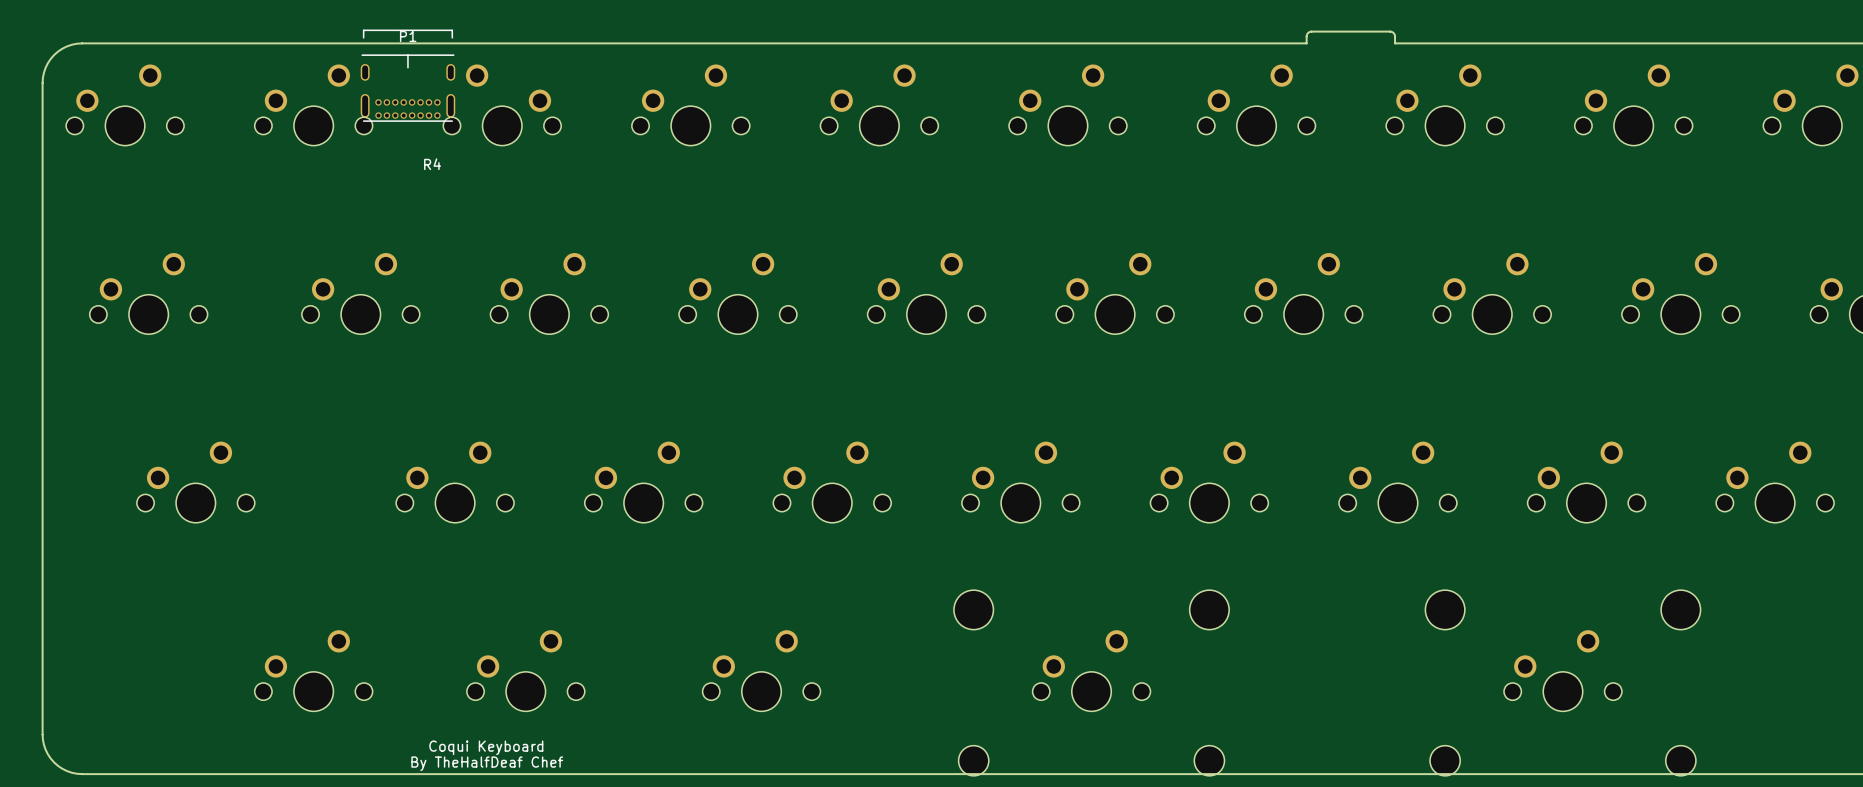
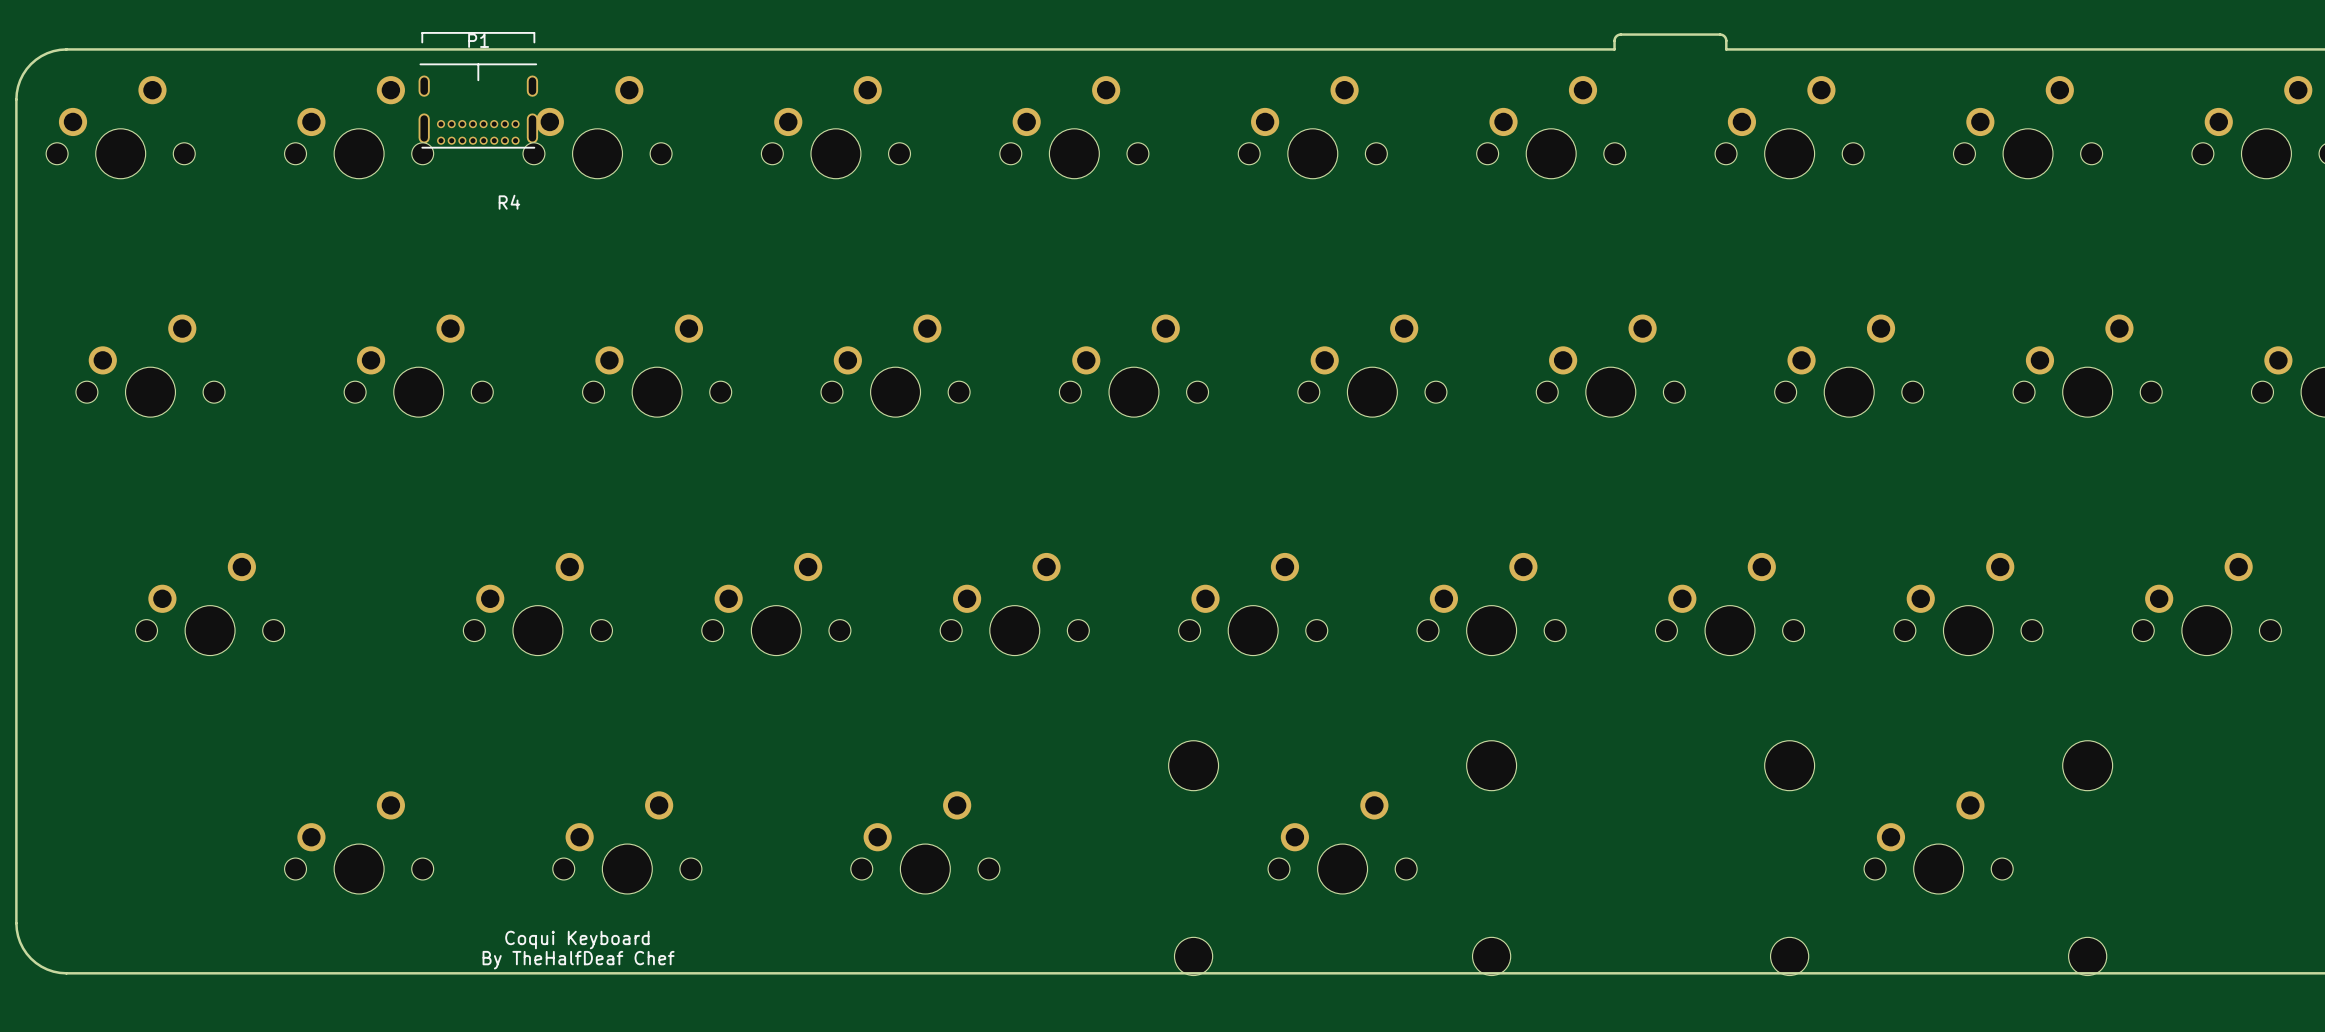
part side: bottom (502, 105) -> top (597, 127)

